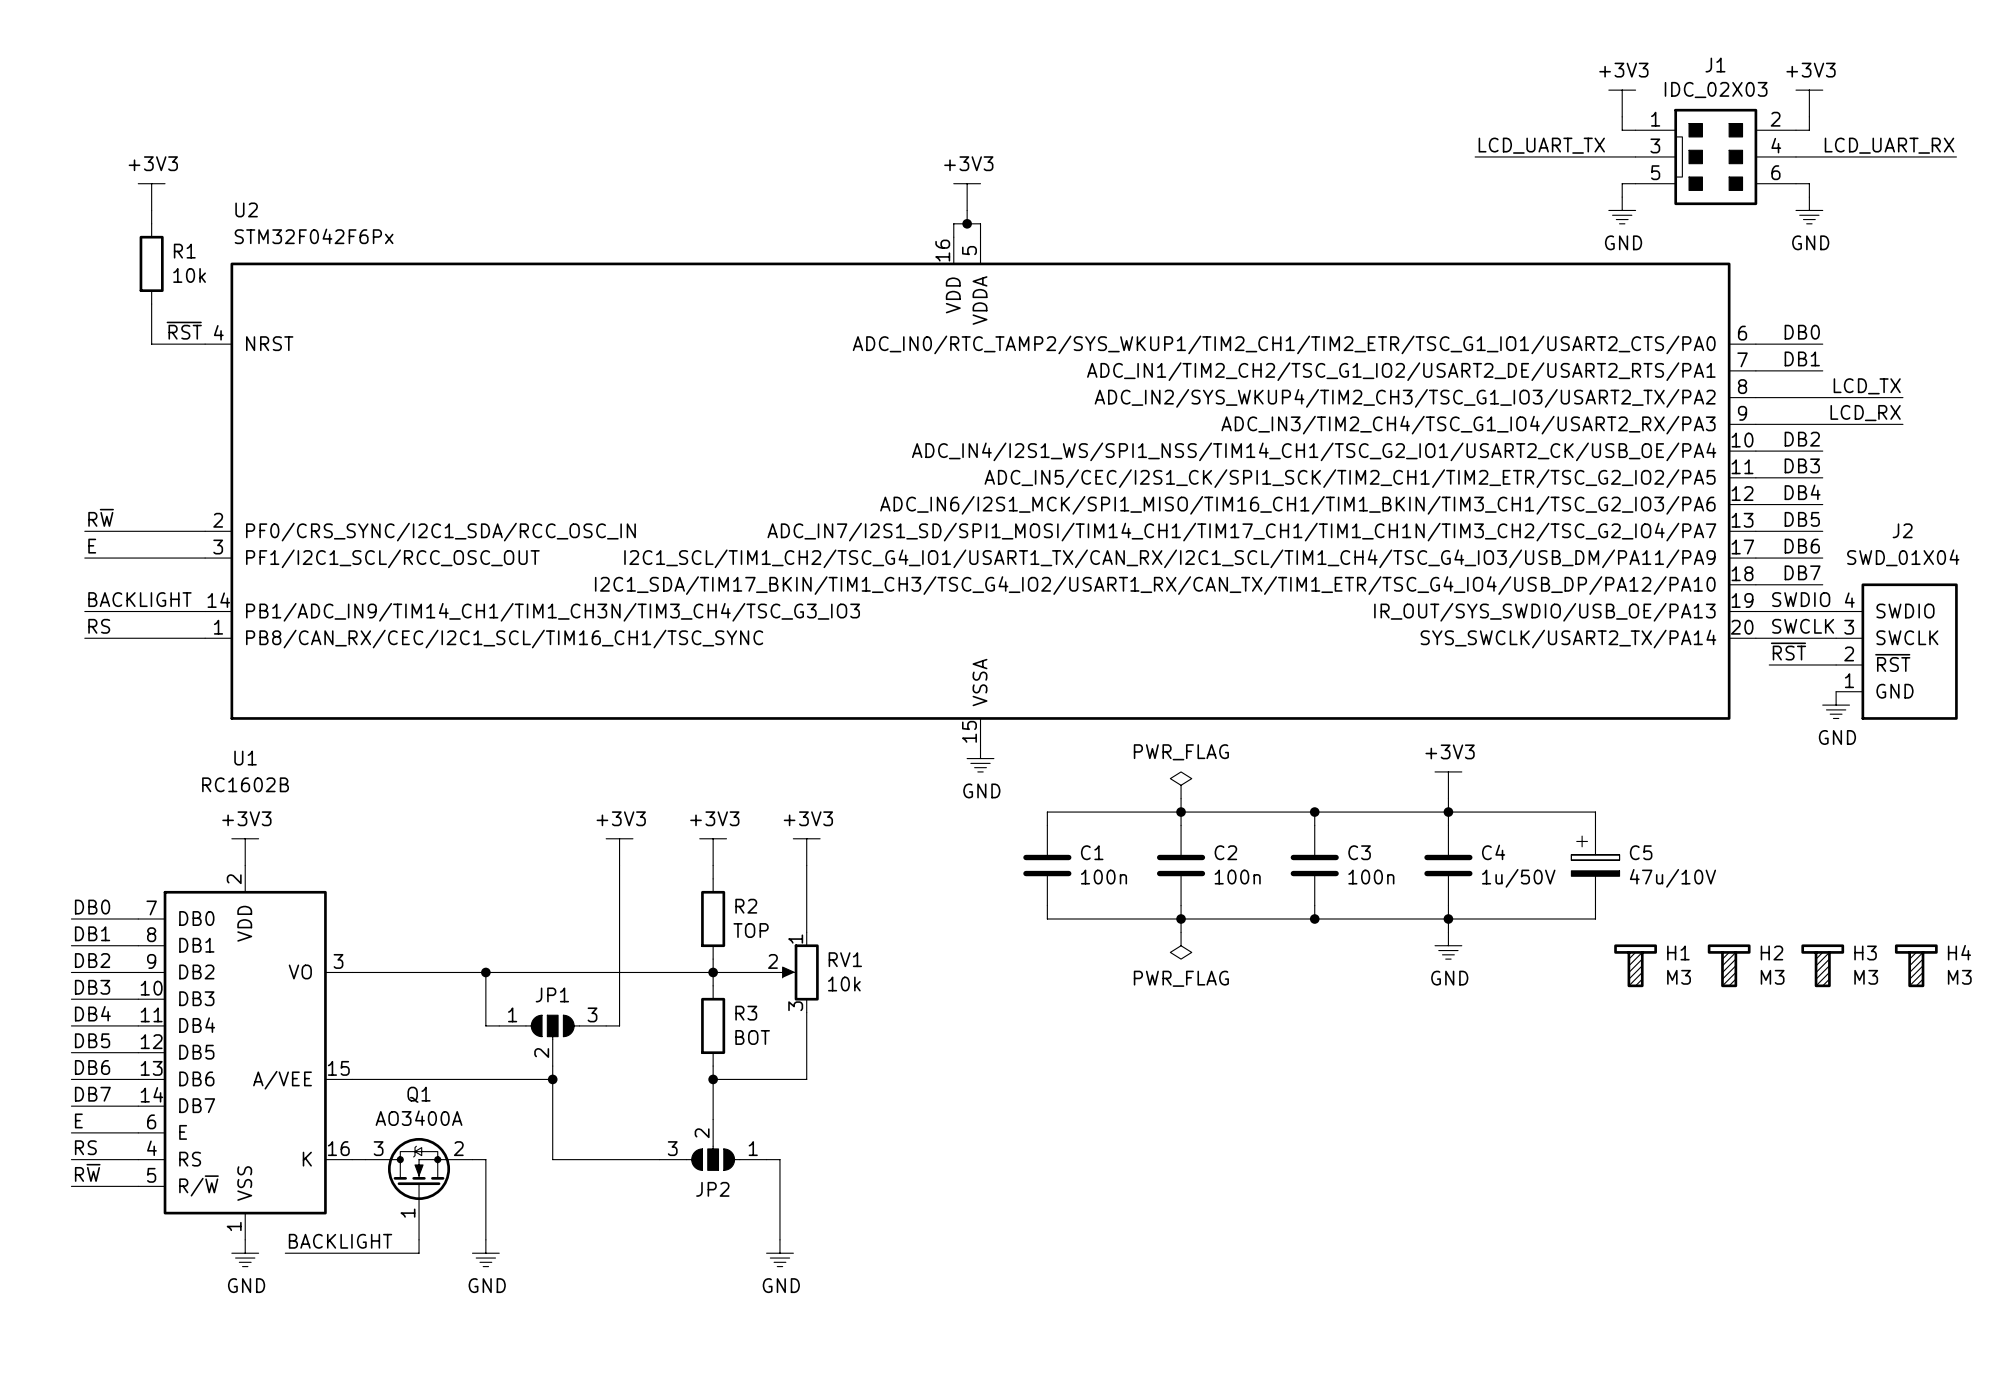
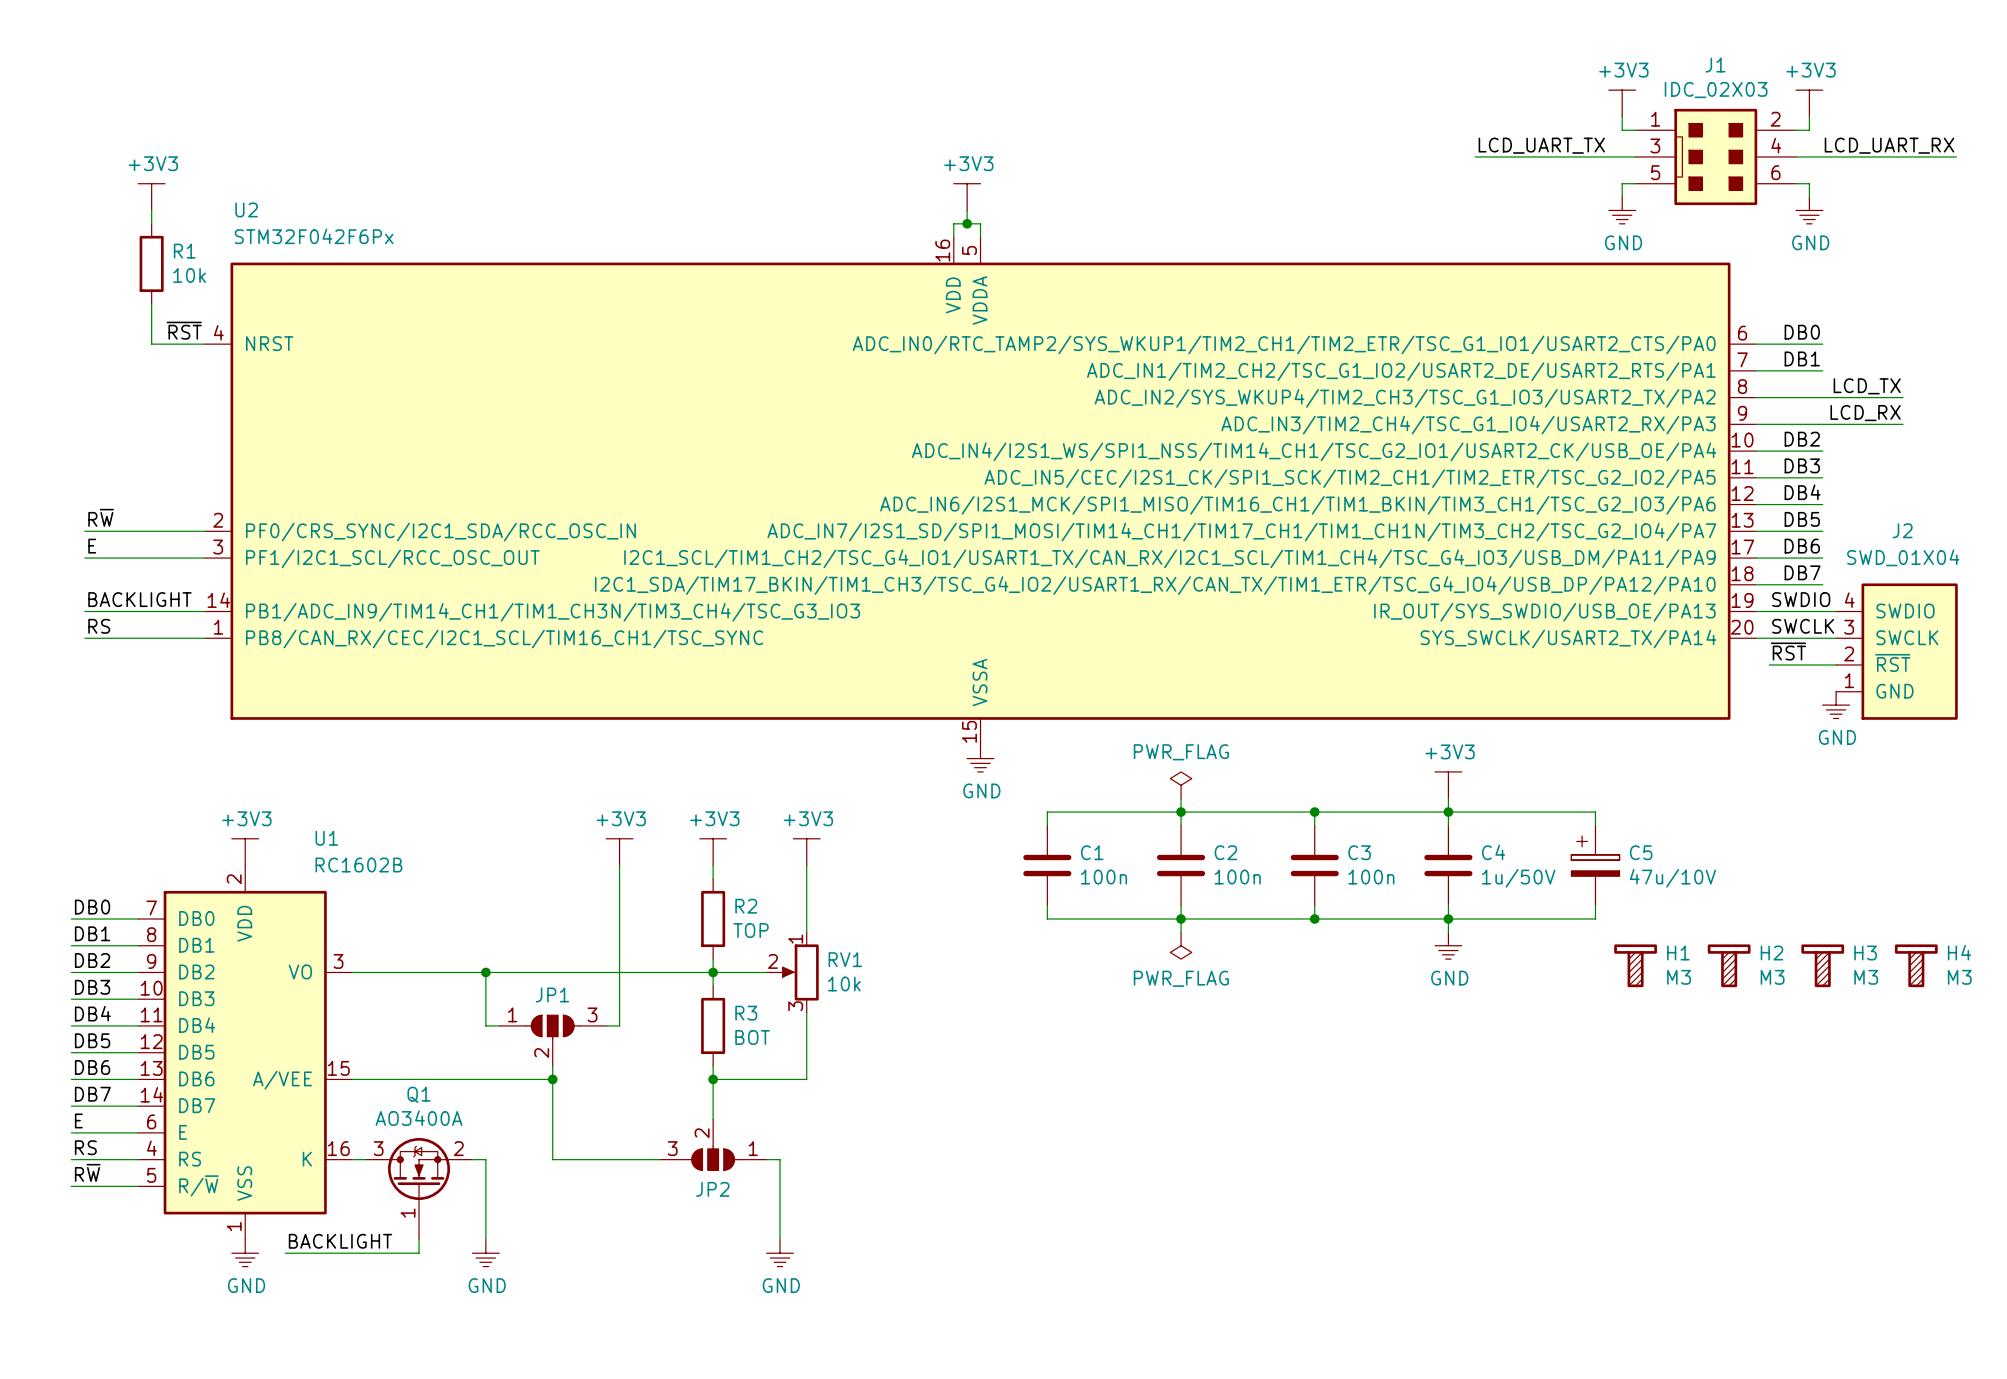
U1 name position: U1 (245, 758) -> U1 (326, 838)
U1 value position: RC1602B (245, 784) -> RC1602B (358, 865)

